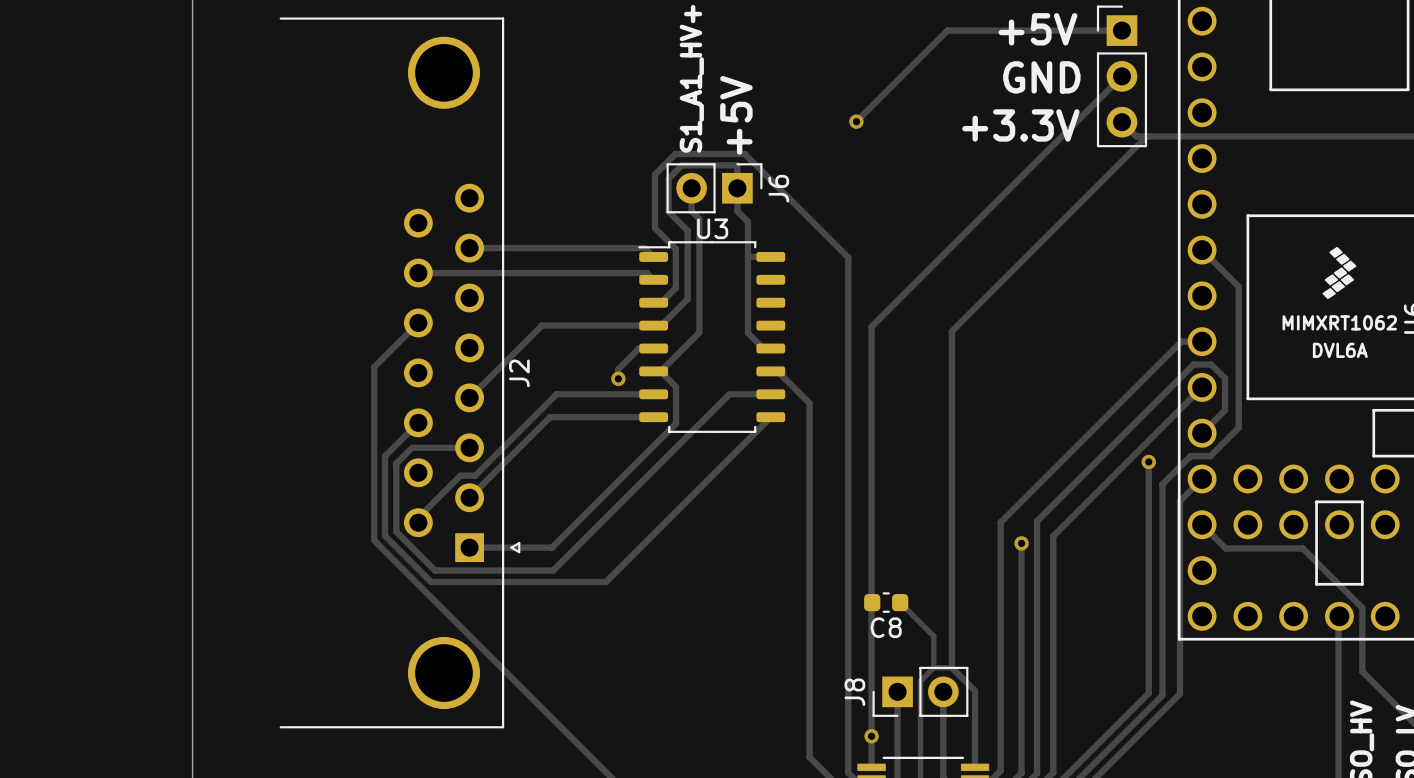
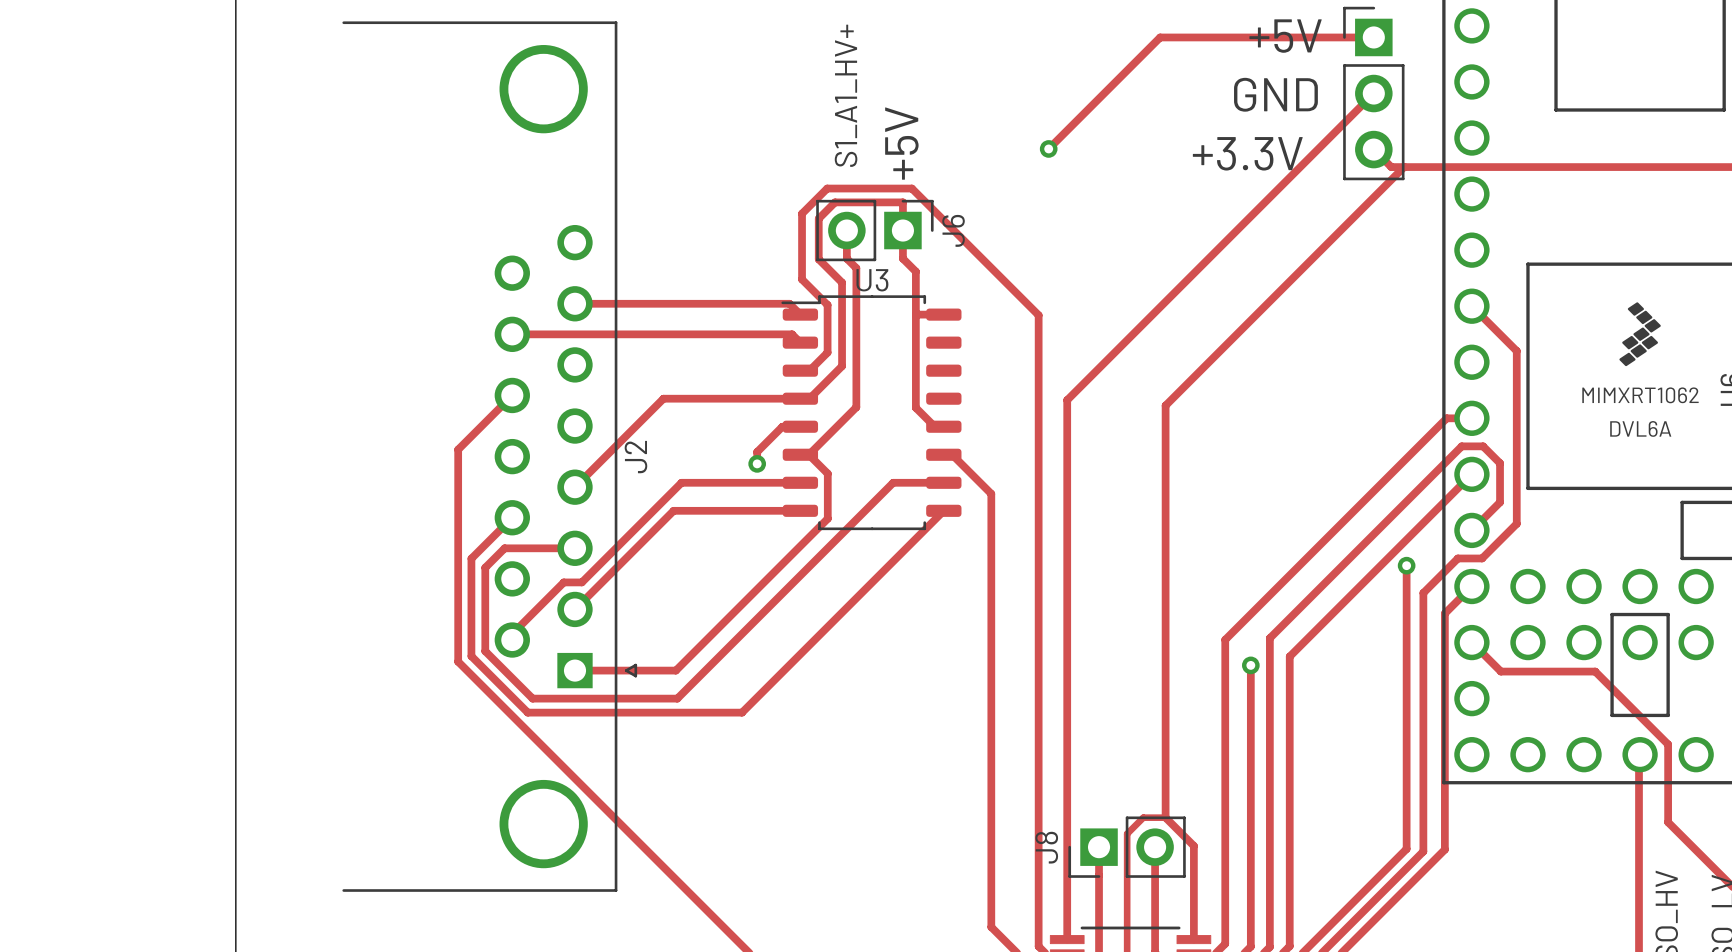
C8: (886, 602) -> none
track: (900, 602) (933, 636) (933, 667) -> none
via: (871, 736) -> none

